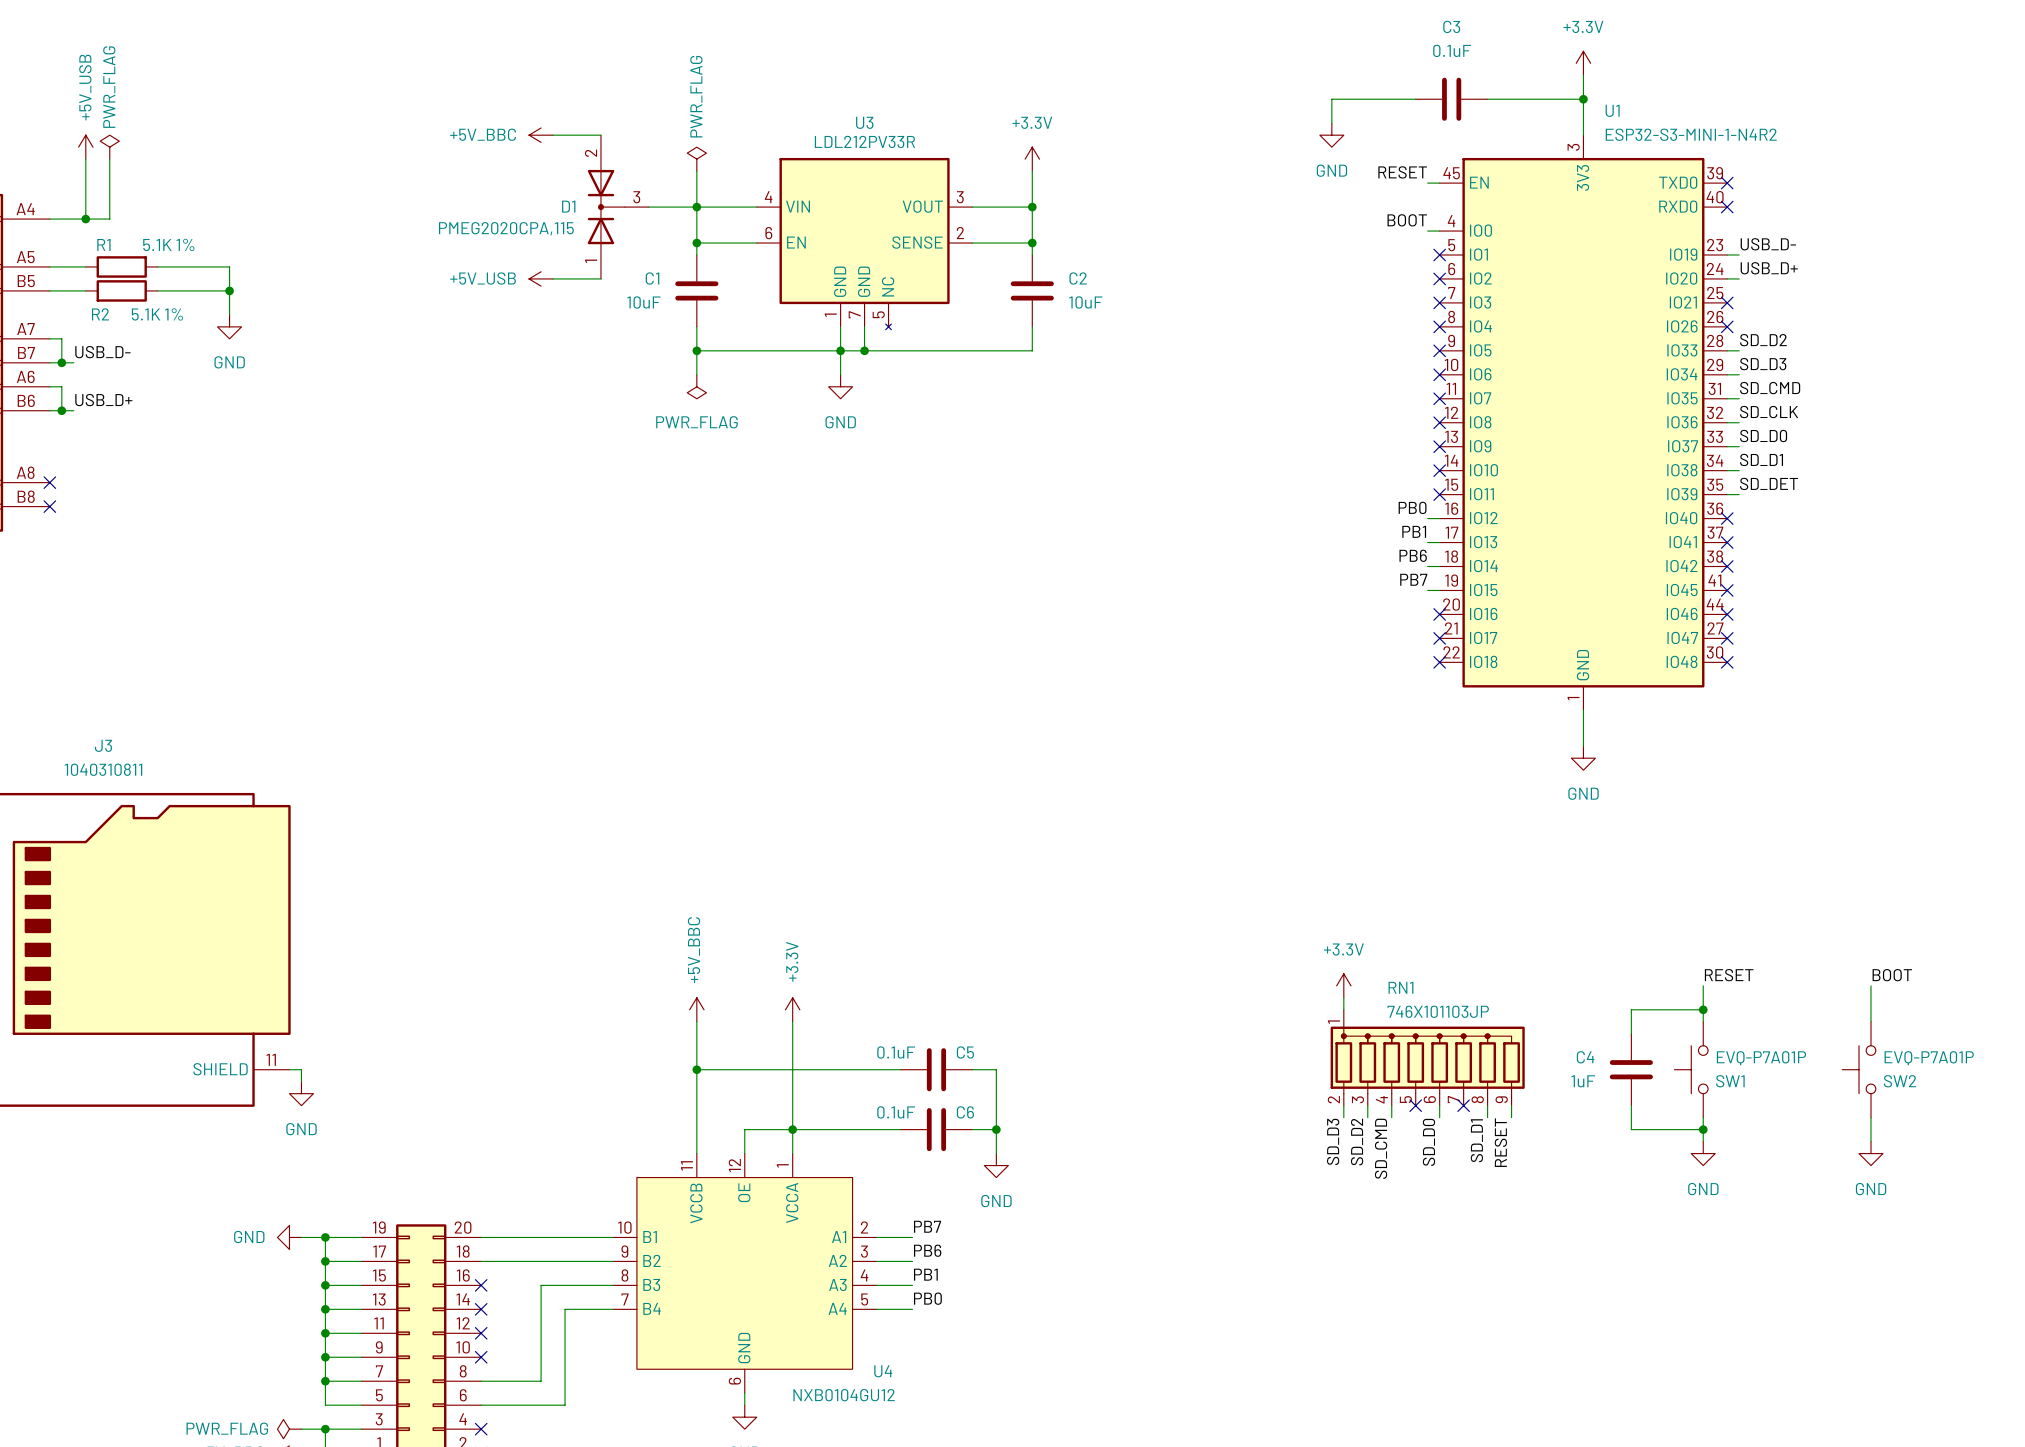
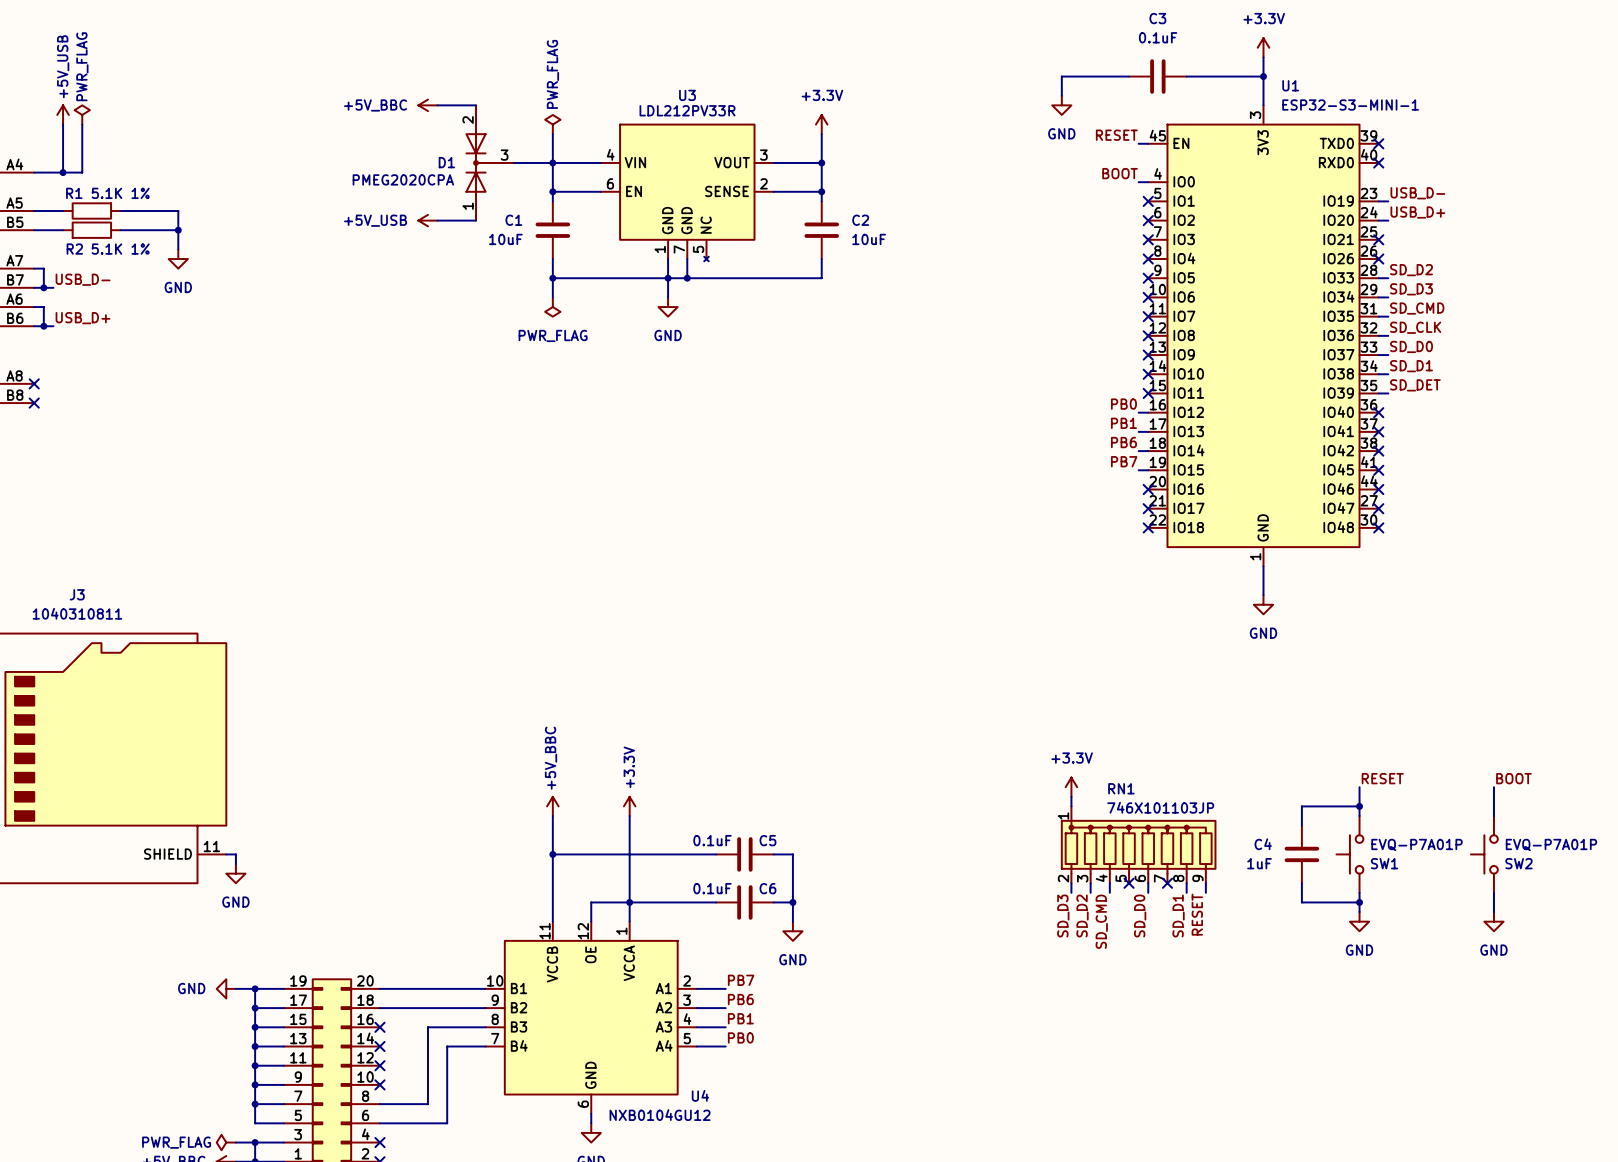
U1 value: ESP32-S3-MINI-1-N4R2 (1691, 134) -> ESP32-S3-MINI-1 (1350, 105)
D1 value: PMEG2020CPA,115 (506, 228) -> PMEG2020CPA (403, 179)

